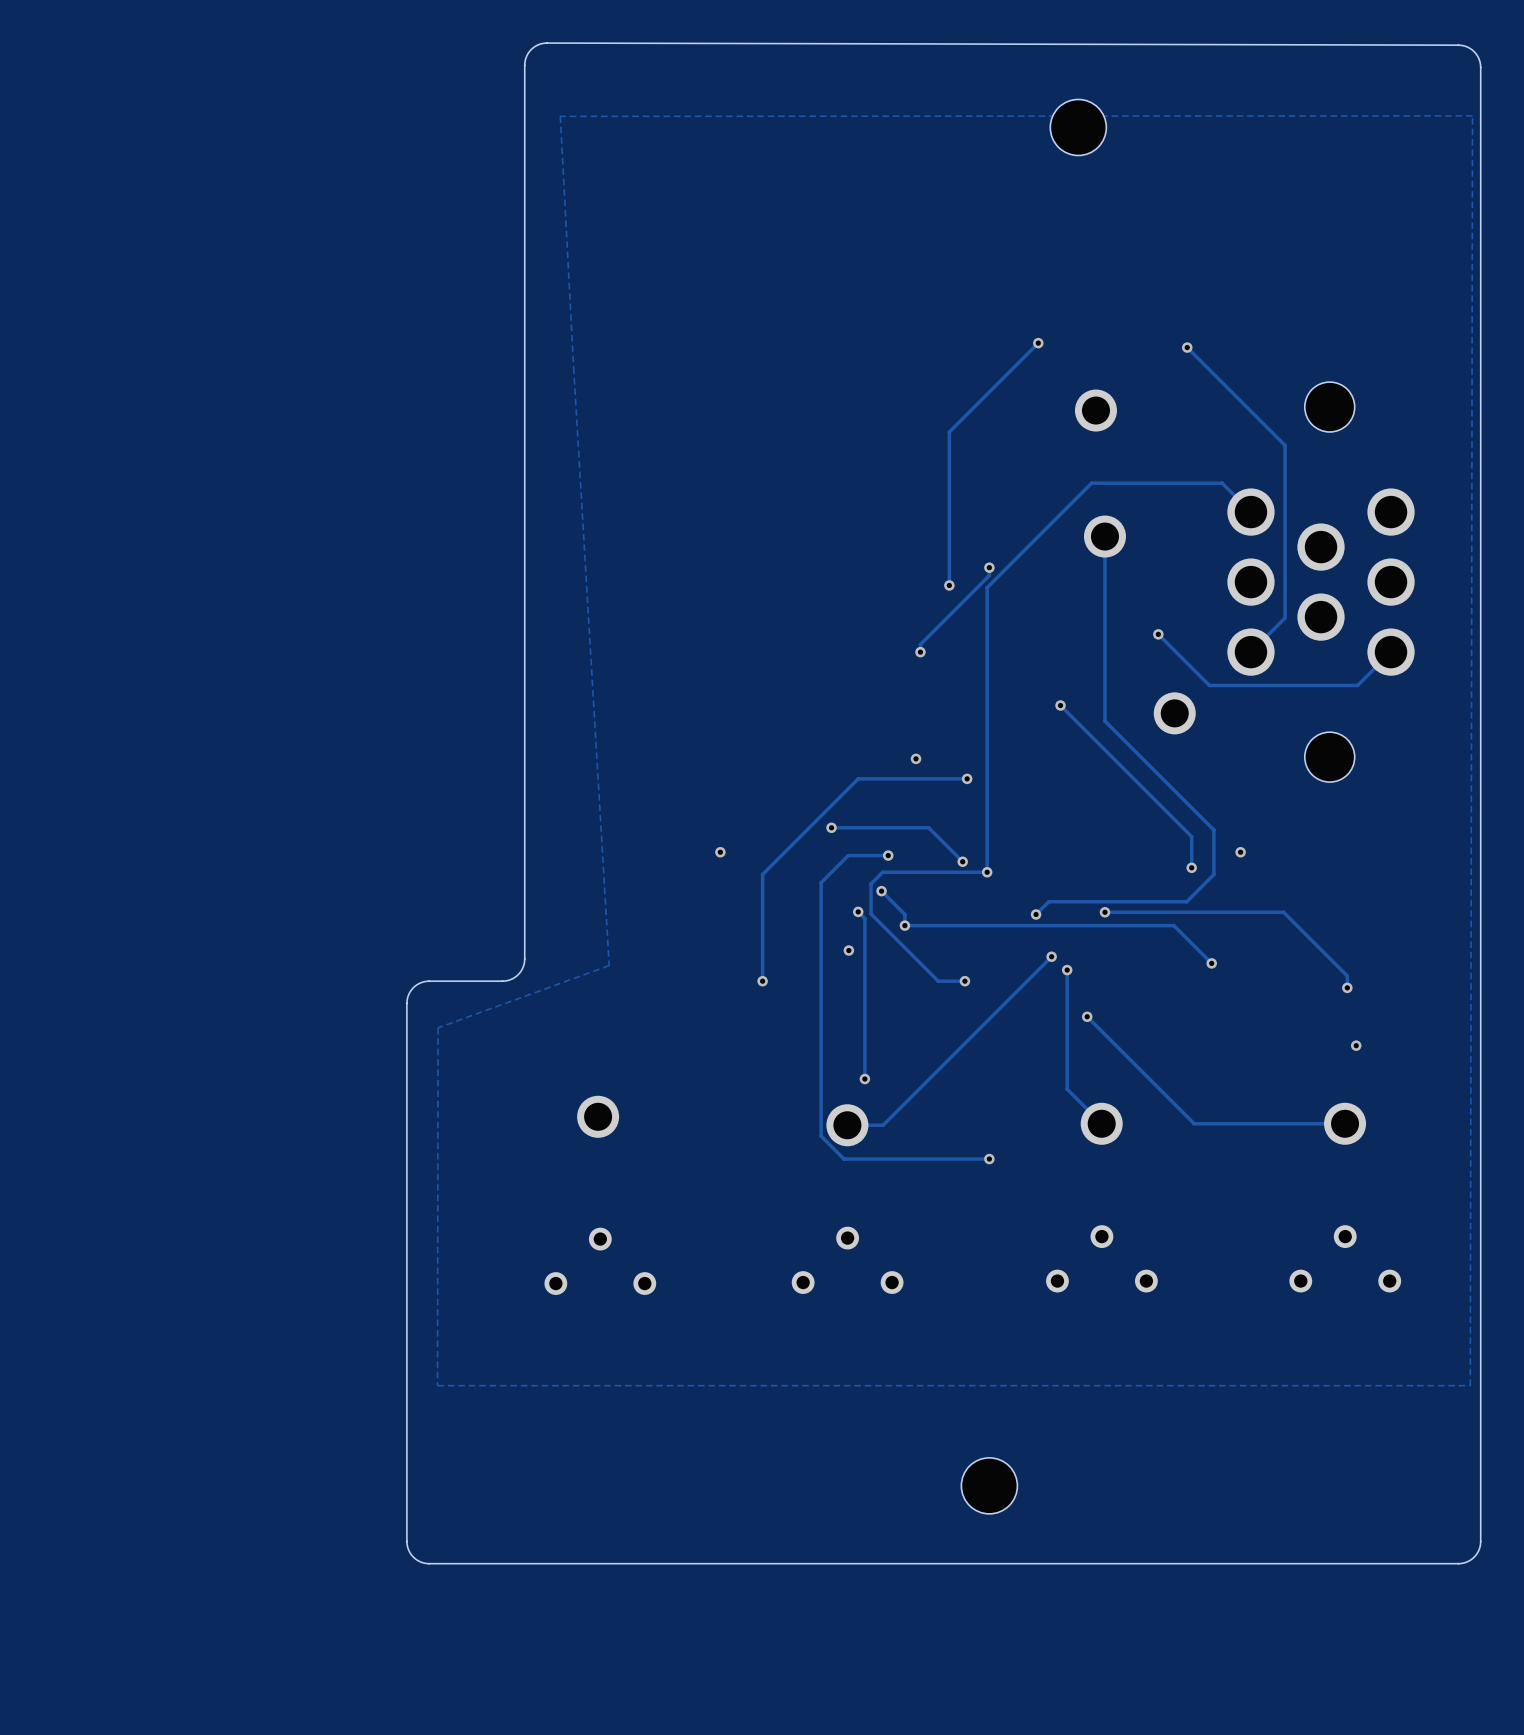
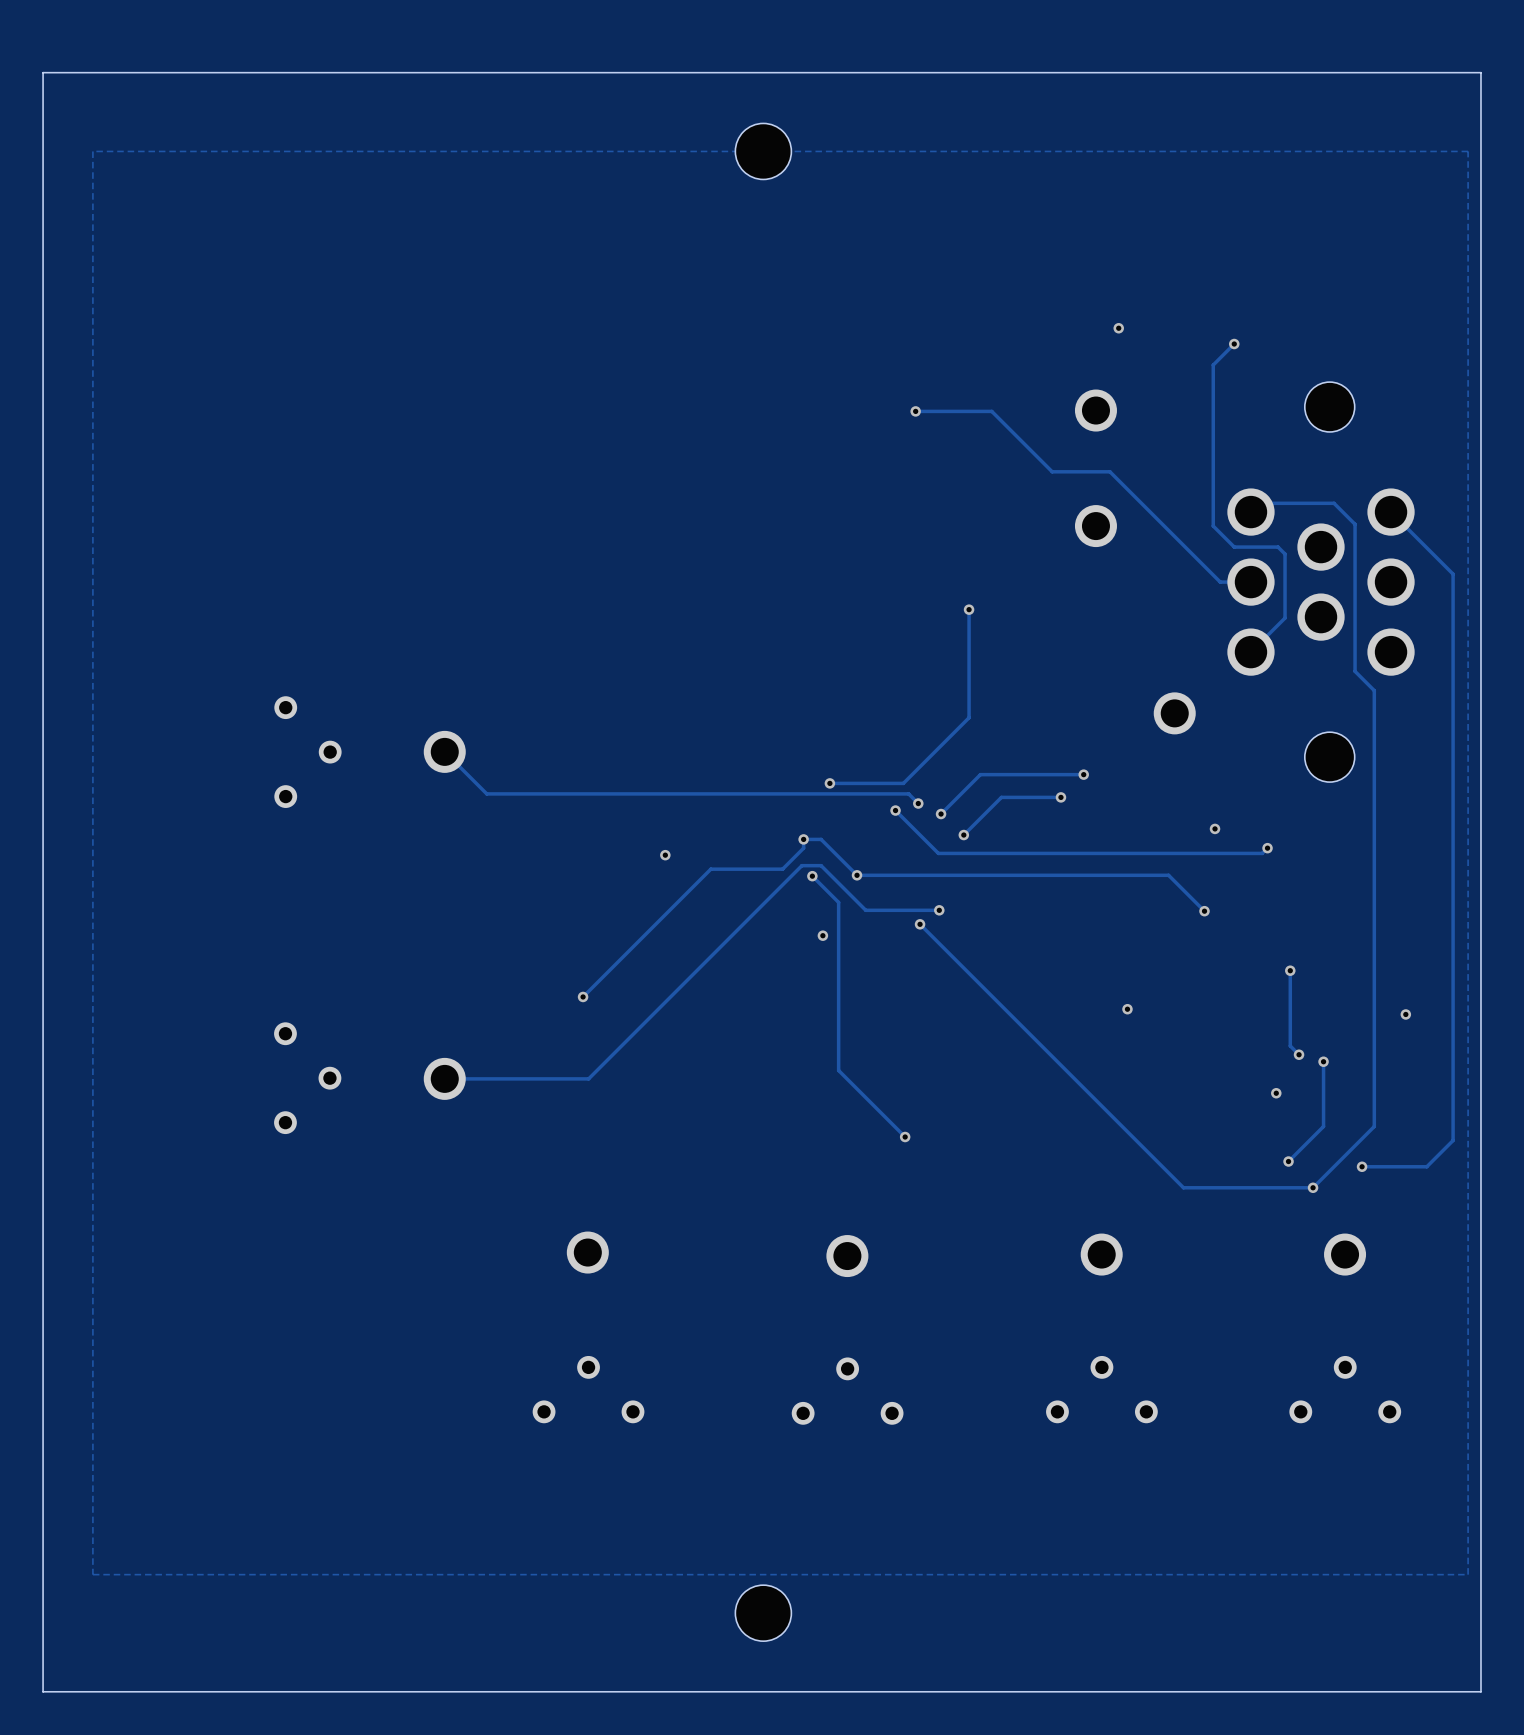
board edge: (547, 43) (1458, 45) (1469, 48) (1477, 56) (1480, 67) (1480, 1541) (1478, 1551) (1470, 1560) (1458, 1563) (429, 1563) (417, 1560) (410, 1553) (406, 1541) (407, 998) (413, 987) (424, 981) (509, 979) (519, 972) (524, 961) (524, 65) (525, 57) (531, 49) (539, 44) (547, 43) -> (1480, 72) (1480, 1691) (43, 1691) (43, 72) (1480, 72)
zone outline: (1472, 115) (560, 116) (609, 965) (438, 1027) (437, 1385) (1470, 1385) (1472, 115) -> (1468, 151) (1468, 1574) (92, 1574) (92, 151) (1468, 151)
part position: (1078, 127) -> (763, 151)
via: none -> (1118, 328)
track: (1038, 343) (949, 432) (949, 585) -> none
via: (1038, 343) -> none
via: none -> (1234, 344)
track: (1187, 347) (1285, 445) (1285, 554) -> (1234, 344) (1213, 365) (1213, 526) (1234, 547) (1278, 547) (1285, 554)
via: (1187, 347) -> none
track: none -> (915, 411) (991, 411) (1052, 471) (1109, 471) (1220, 582) (1250, 582)
via: none -> (915, 411)
track: (1250, 512) (1222, 483) (1091, 483) (987, 587) (987, 872) (882, 872) (871, 883) (871, 914) (938, 981) (964, 981) -> (1250, 512) (1259, 503) (1334, 503) (1355, 524) (1355, 671) (1374, 690) (1374, 1126) (1313, 1187) (1183, 1187) (920, 924)
track: none -> (1391, 512) (1453, 574) (1453, 1140) (1426, 1166) (1362, 1166)
track: (1104, 535) (1104, 721) (1213, 830) (1213, 874) (1186, 901) (1048, 901) (1036, 914) -> none
part position: (1104, 536) -> (1095, 526)
track: (989, 567) (989, 575) (920, 644) (920, 652) -> none
via: (989, 567) -> none
via: (949, 585) -> none
track: none -> (969, 609) (969, 717) (903, 783) (829, 783)
via: none -> (969, 609)
track: (1158, 634) (1209, 685) (1357, 685) (1391, 652) -> none
via: (1158, 634) -> none
via: (920, 652) -> none
track: (1060, 705) (1191, 836) (1191, 867) -> none
via: (1060, 705) -> none
track: none -> (444, 751) (486, 793) (908, 793) (918, 803)
part: none -> (444, 751)
part: none -> (307, 752)
via: (916, 758) -> none
track: none -> (1083, 774) (980, 774) (941, 814)
via: none -> (1083, 774)
track: (967, 778) (858, 778) (762, 874) (762, 981) -> none
via: (967, 778) -> none
via: none -> (829, 783)
track: none -> (1060, 797) (1001, 797) (963, 835)
via: none -> (1060, 797)
via: none -> (918, 803)
track: none -> (895, 810) (938, 853) (1262, 853) (1267, 848)
via: none -> (895, 810)
via: none -> (941, 814)
track: (831, 827) (928, 827) (962, 861) -> none
via: (831, 827) -> none
via: none -> (1215, 828)
via: none -> (963, 835)
via: none -> (803, 839)
via: none -> (1267, 848)
via: (720, 852) -> none
via: (1240, 852) -> none
via: none -> (665, 855)
track: (888, 855) (848, 855) (821, 882) (821, 1136) (844, 1159) (989, 1159) -> none
via: (888, 855) -> none
via: (962, 861) -> none
via: (1191, 867) -> none
via: (987, 872) -> none
via: none -> (857, 875)
track: none -> (812, 876) (838, 902) (838, 1070) (905, 1137)
via: none -> (812, 876)
track: (881, 891) (904, 914) (904, 925) (1173, 925) (1211, 963) -> none
via: (881, 891) -> none
track: none -> (939, 910) (865, 910) (821, 865) (801, 865) (588, 1078) (444, 1078)
via: none -> (939, 910)
track: (858, 911) (864, 918) (864, 1079) -> none
via: (858, 911) -> none
track: none -> (1204, 911) (1168, 875) (857, 875) (821, 839) (803, 839) (803, 848) (782, 869) (710, 869) (583, 996)
via: none -> (1204, 911)
track: (1104, 912) (1283, 912) (1347, 975) (1347, 987) -> none
via: (1104, 912) -> none
via: (1036, 914) -> none
via position: (904, 925) -> (920, 924)
via: none -> (822, 935)
via: (848, 950) -> none
track: (1051, 956) (883, 1125) (847, 1125) -> none
via: (1051, 956) -> none
via: (1211, 963) -> none
track: (1067, 970) (1067, 1089) (1101, 1123) -> none
via: (1067, 970) -> none
track: none -> (1290, 970) (1290, 1045) (1299, 1054)
via: none -> (1290, 970)
via: (762, 981) -> none
via: (964, 981) -> none
via: (1347, 987) -> none
via: none -> (583, 996)
via: none -> (1127, 1009)
via: none -> (1405, 1014)
track: (1087, 1016) (1194, 1123) (1345, 1123) -> none
via: (1087, 1016) -> none
via: (1356, 1045) -> none
via: none -> (1299, 1054)
track: none -> (1323, 1061) (1323, 1126) (1288, 1161)
via: none -> (1323, 1061)
part: none -> (307, 1078)
via: (864, 1079) -> none
via: none -> (1276, 1093)
part position: (598, 1116) -> (444, 1078)
part: (1101, 1123) -> none
part: (1345, 1123) -> none
part: (847, 1125) -> none
via: none -> (905, 1137)
via: (989, 1159) -> none
via: none -> (1288, 1161)
via: none -> (1362, 1166)
via: none -> (1313, 1187)
part footprint: [1046, 1225, 1158, 1293] -> [1080, 1233, 1123, 1276]
part footprint: [1289, 1225, 1402, 1293] -> [1324, 1233, 1367, 1276]
part footprint: [791, 1226, 904, 1294] -> [826, 1235, 869, 1278]
part footprint: [544, 1227, 657, 1295] -> [566, 1231, 609, 1274]
part: none -> (588, 1389)
part: none -> (1101, 1389)
part: none -> (1345, 1389)
part: none -> (847, 1391)
part position: (989, 1485) -> (763, 1613)

